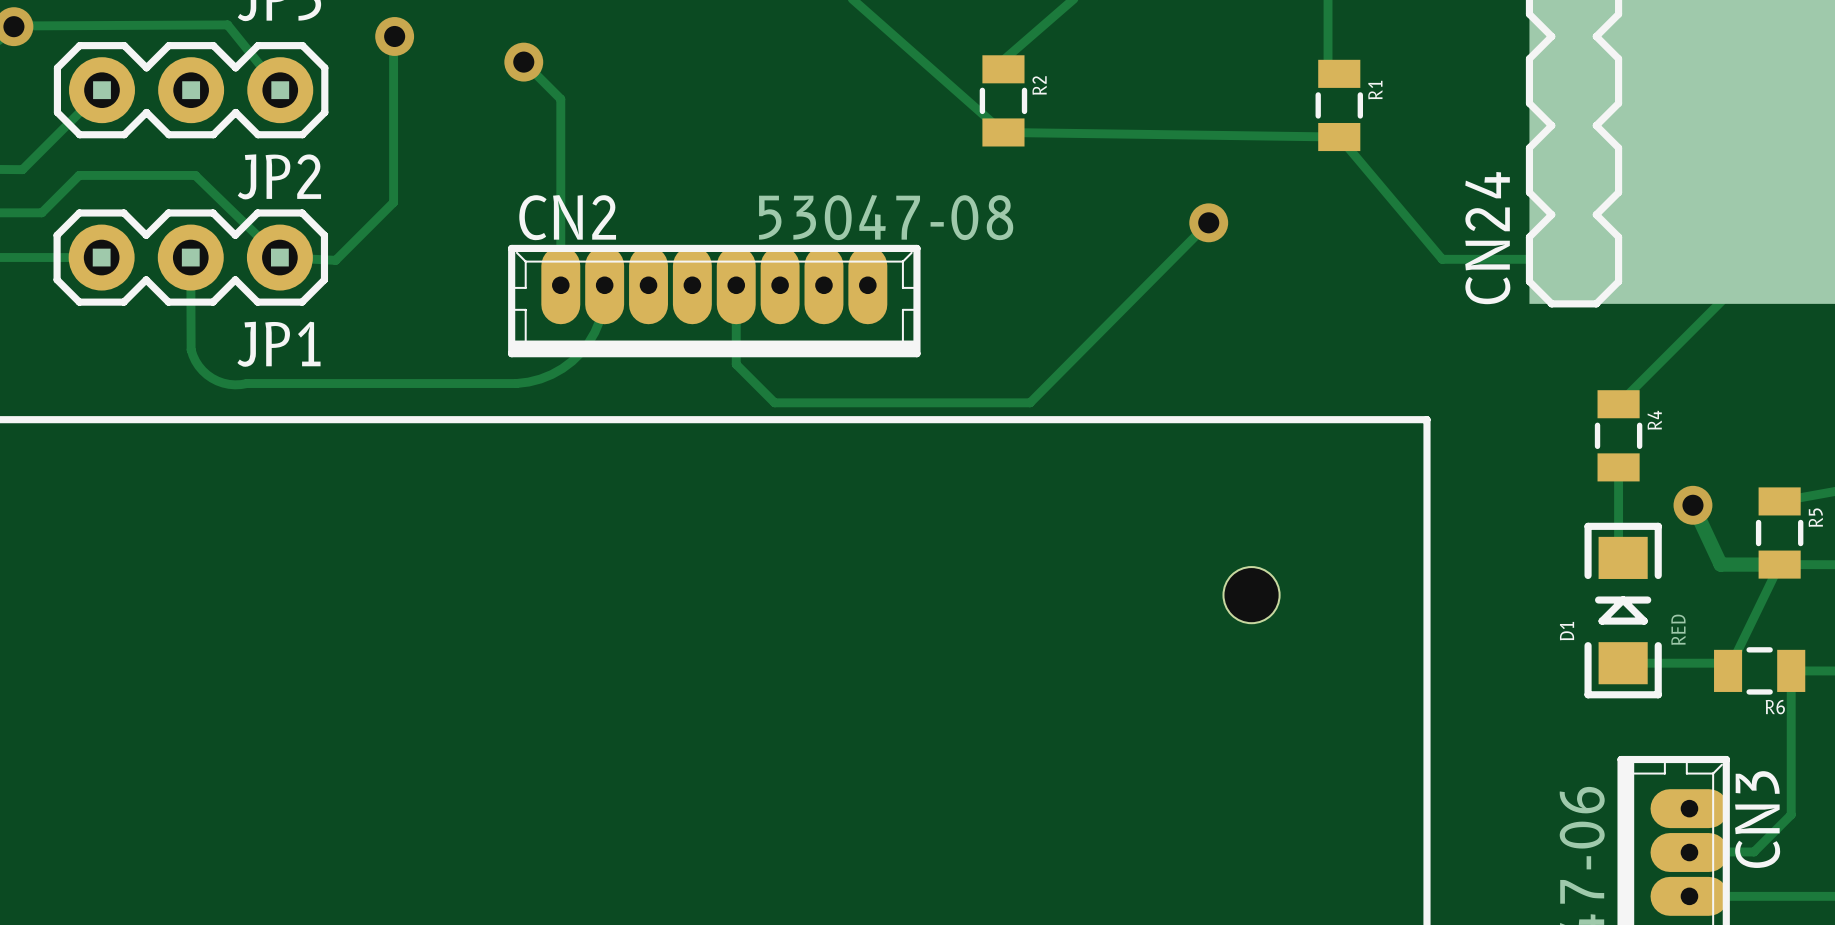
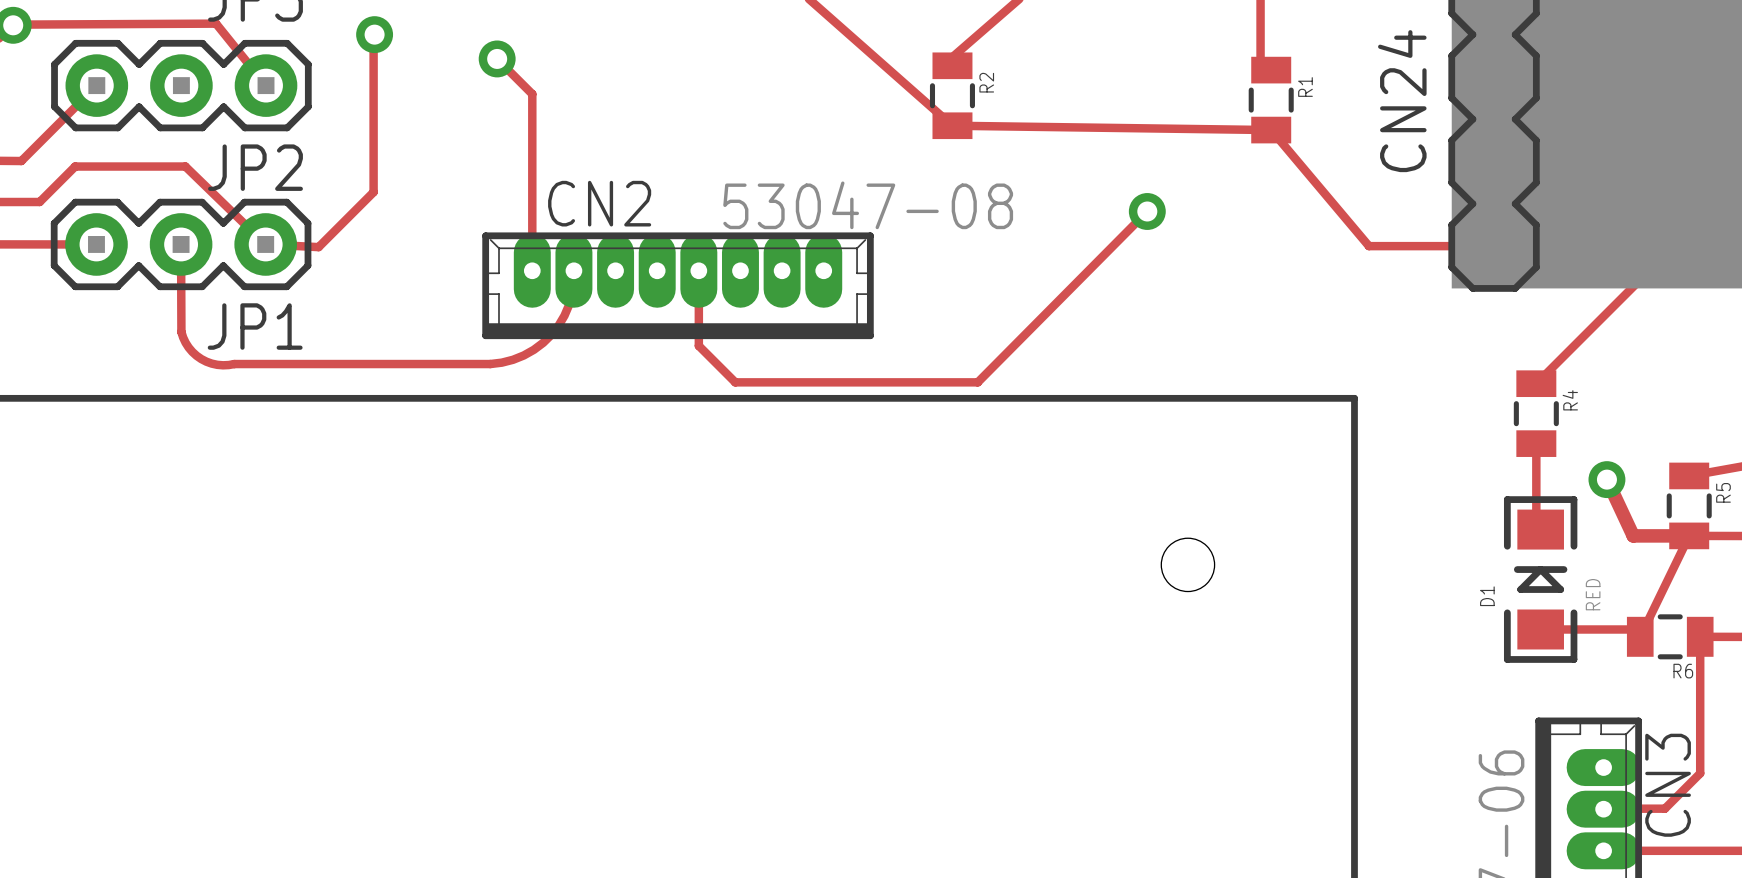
CN2 name position: CN2 (567, 217) -> CN2 (599, 203)
CN24 name position: CN24 (1487, 238) -> CN24 (1402, 101)

